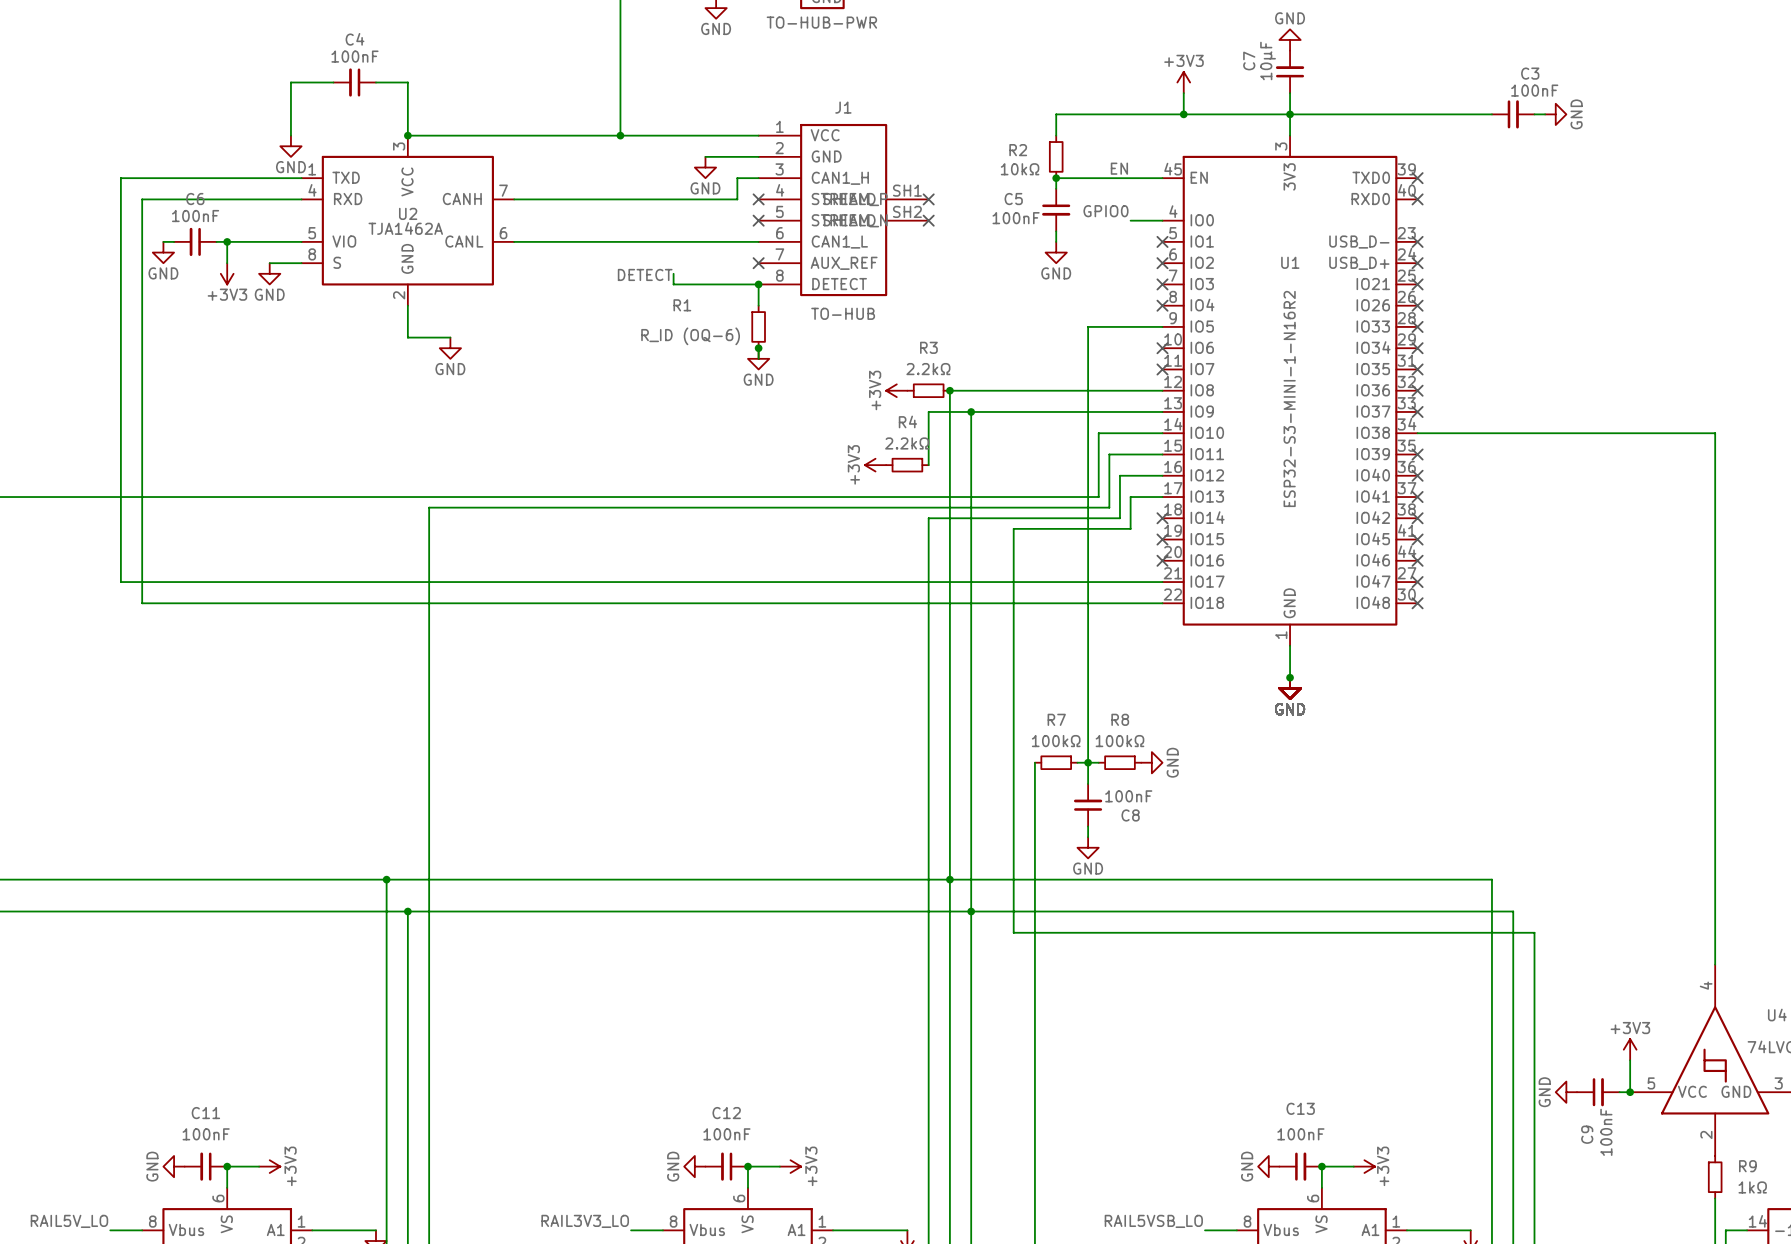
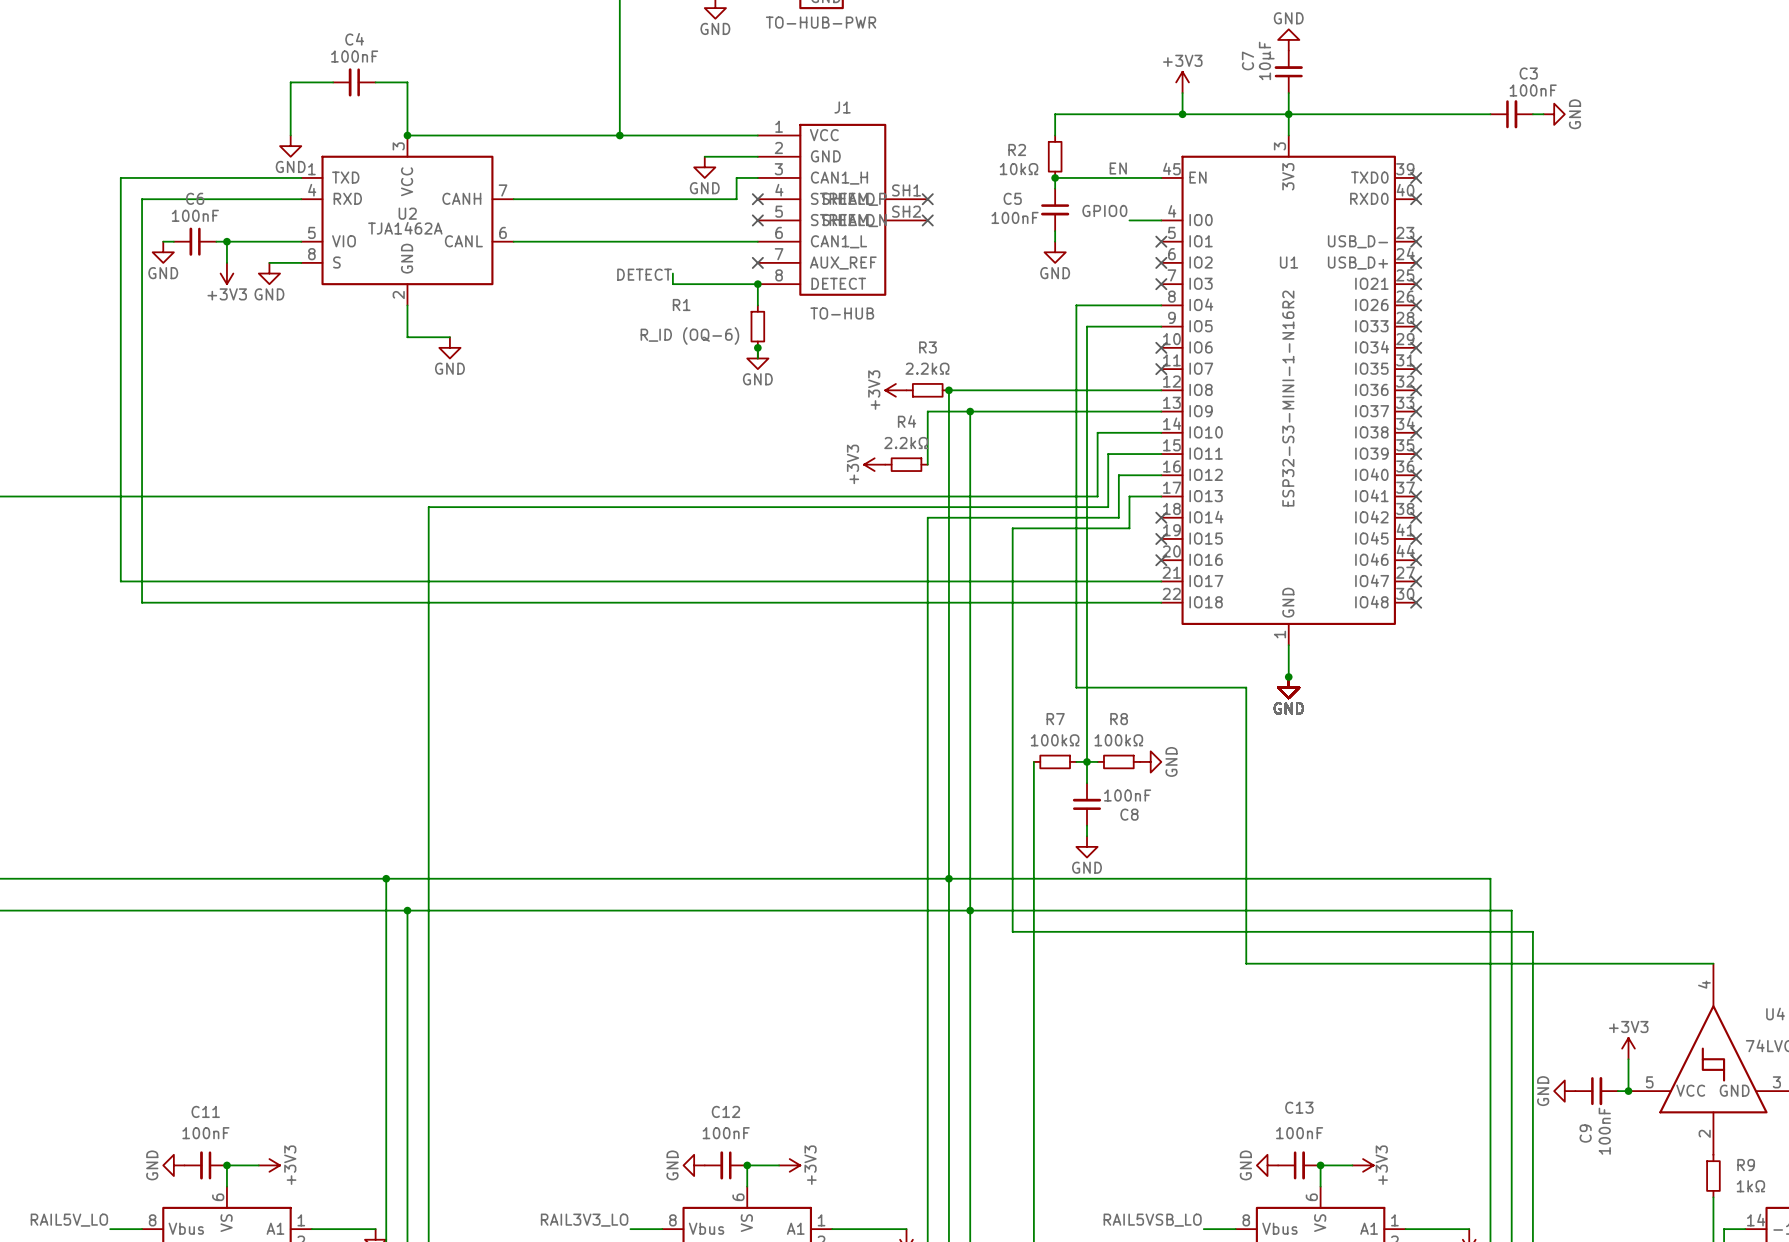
no-connect mark: (1162, 305) -> none
wire: (1417, 433) (1715, 433) (1715, 964) -> (1161, 305) (1076, 305) (1076, 687) (1246, 687) (1246, 963) (1713, 963)
no-connect mark: none -> (1416, 432)

